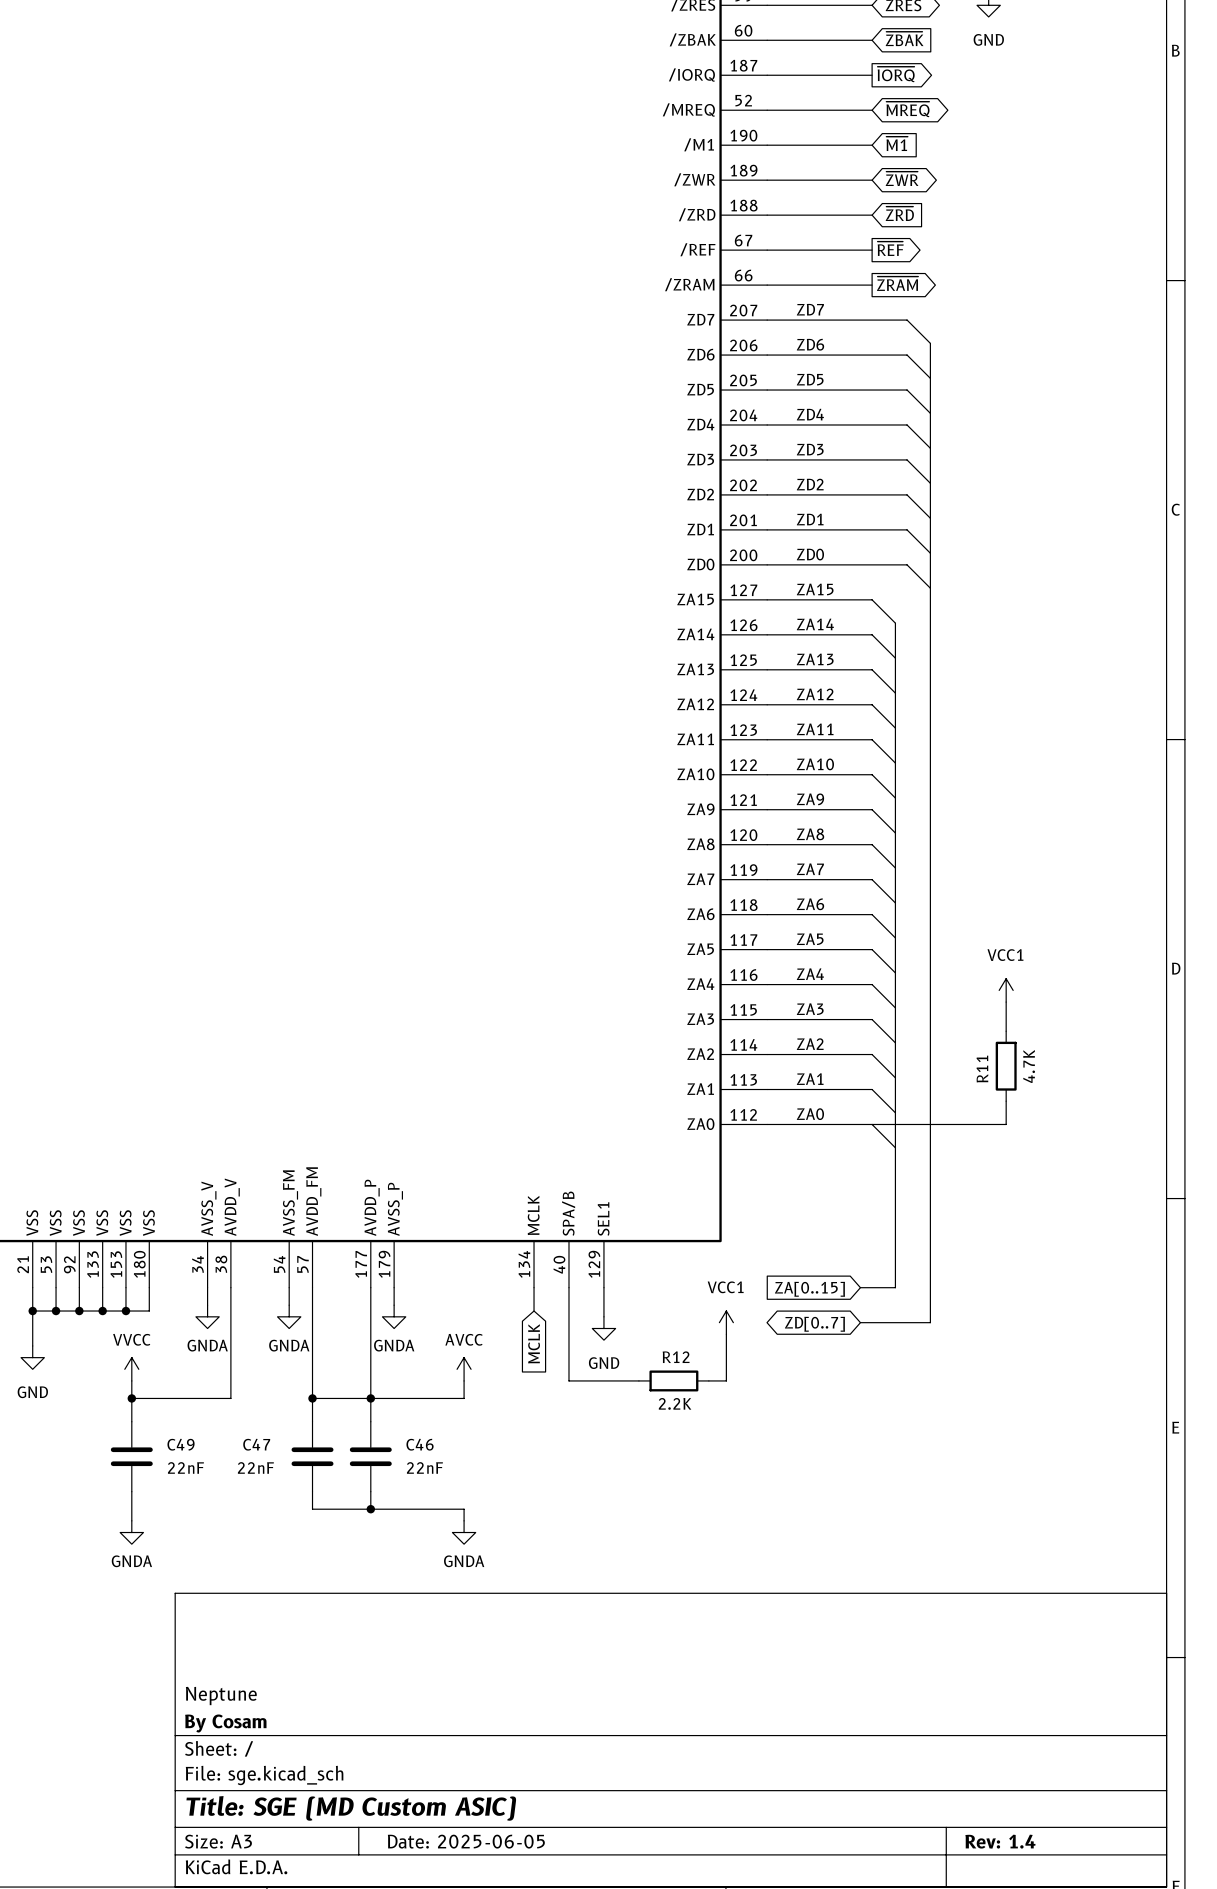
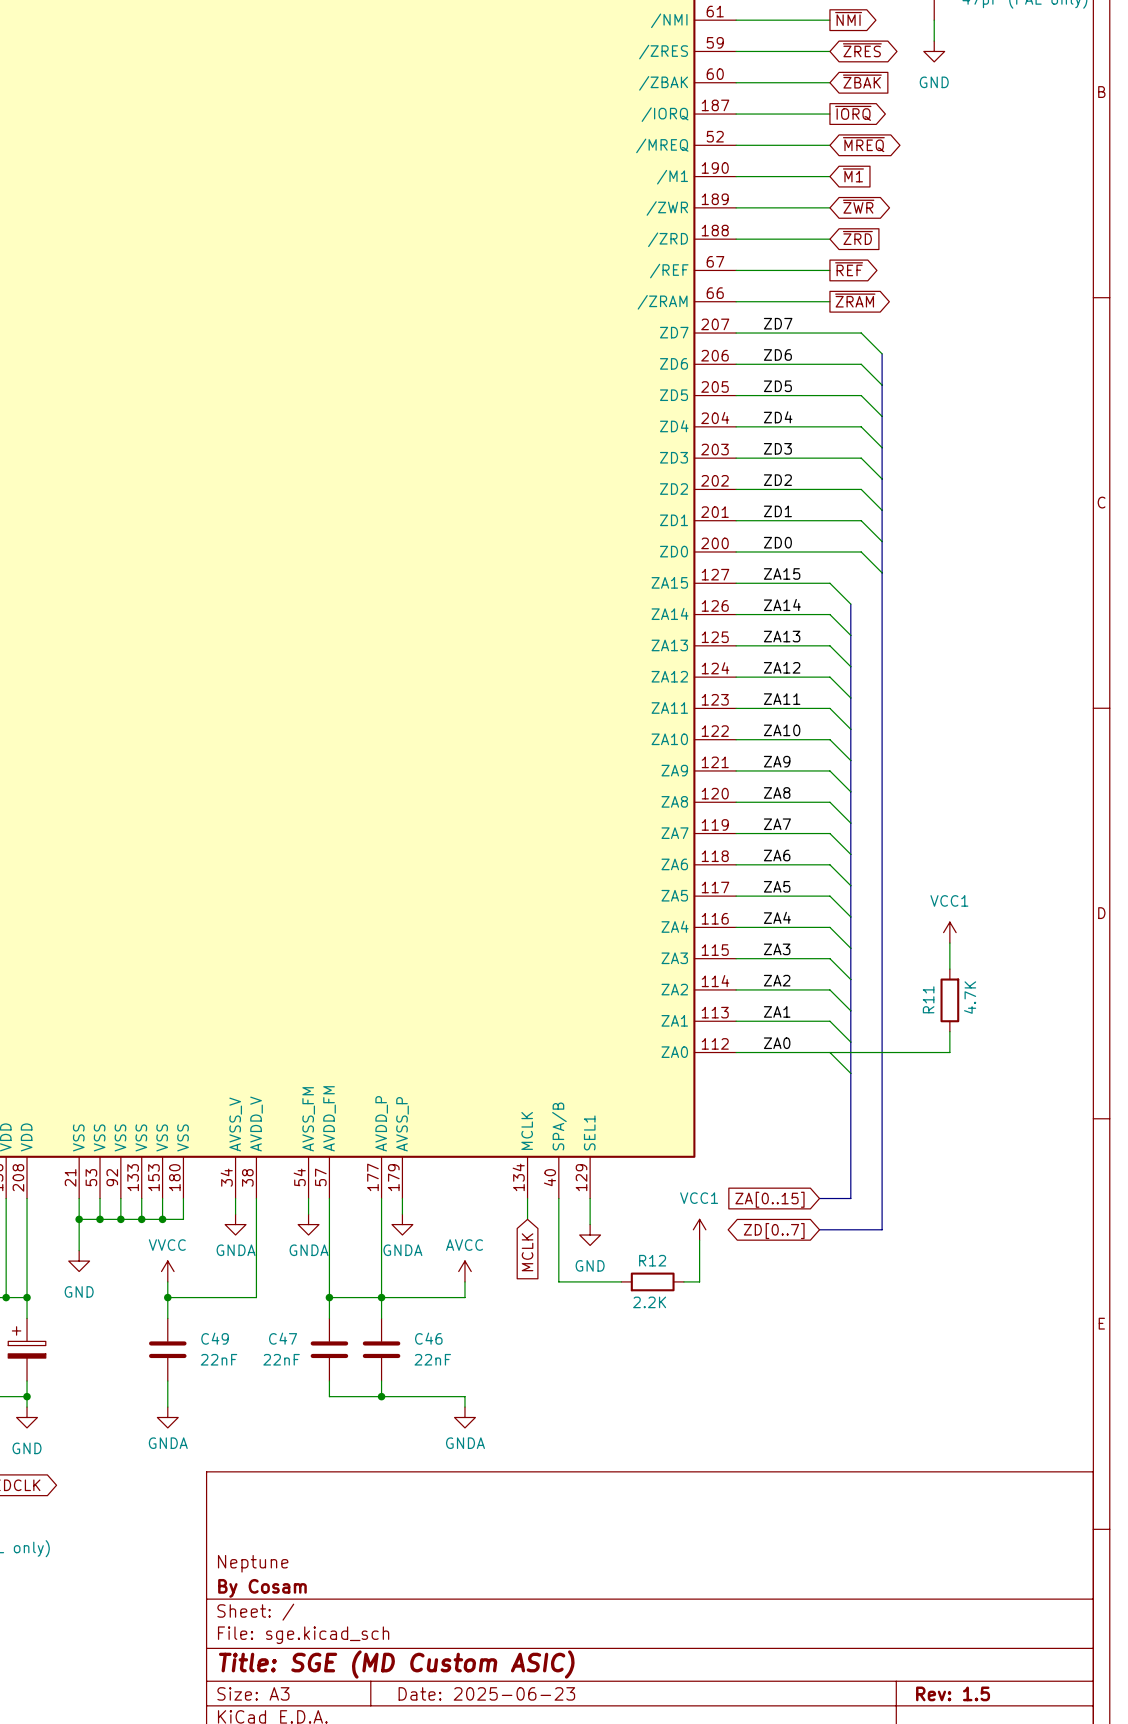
title block: Date: 2025-06-05 (466, 1841) -> Date: 2025-06-23 (486, 1693)
title block: Rev: 1.4 (1000, 1841) -> Rev: 1.5 (953, 1693)

